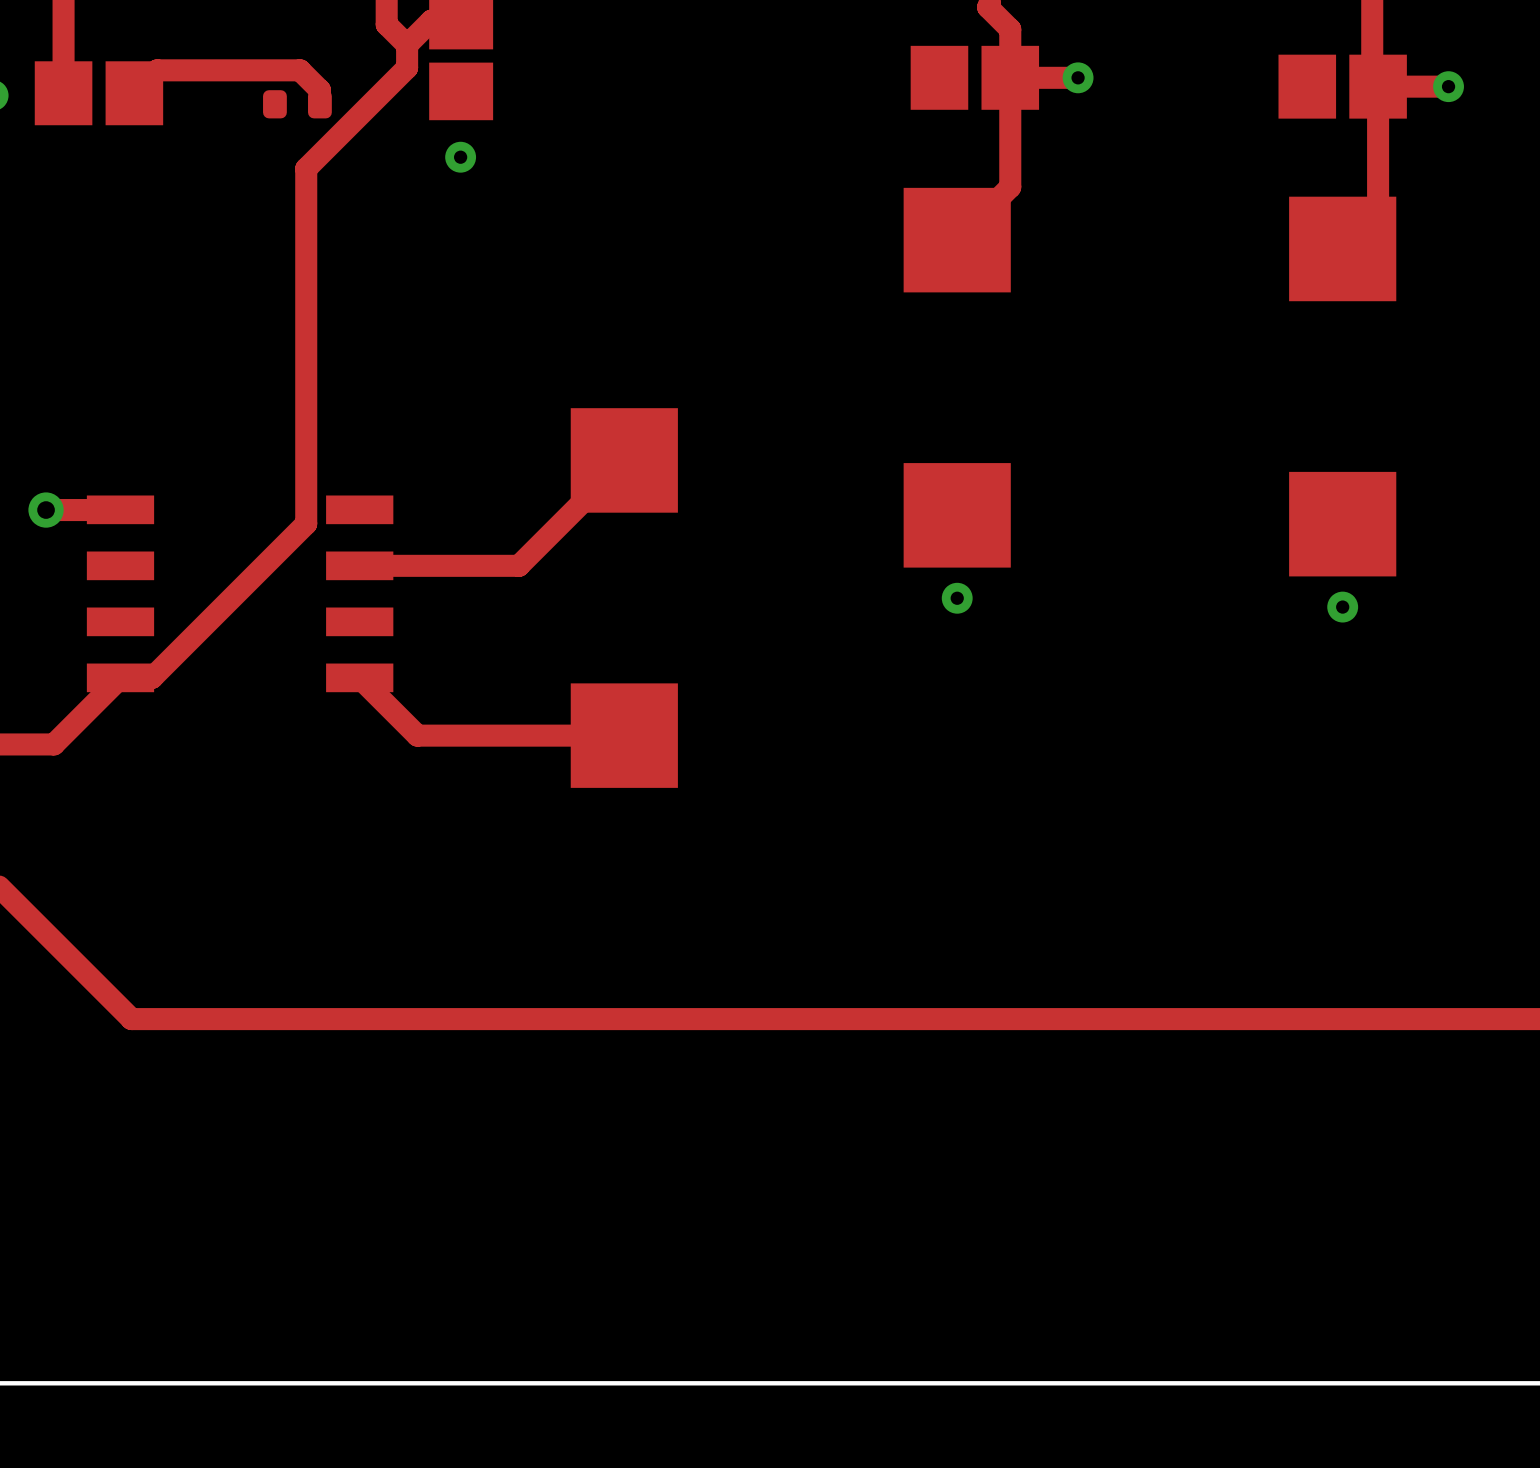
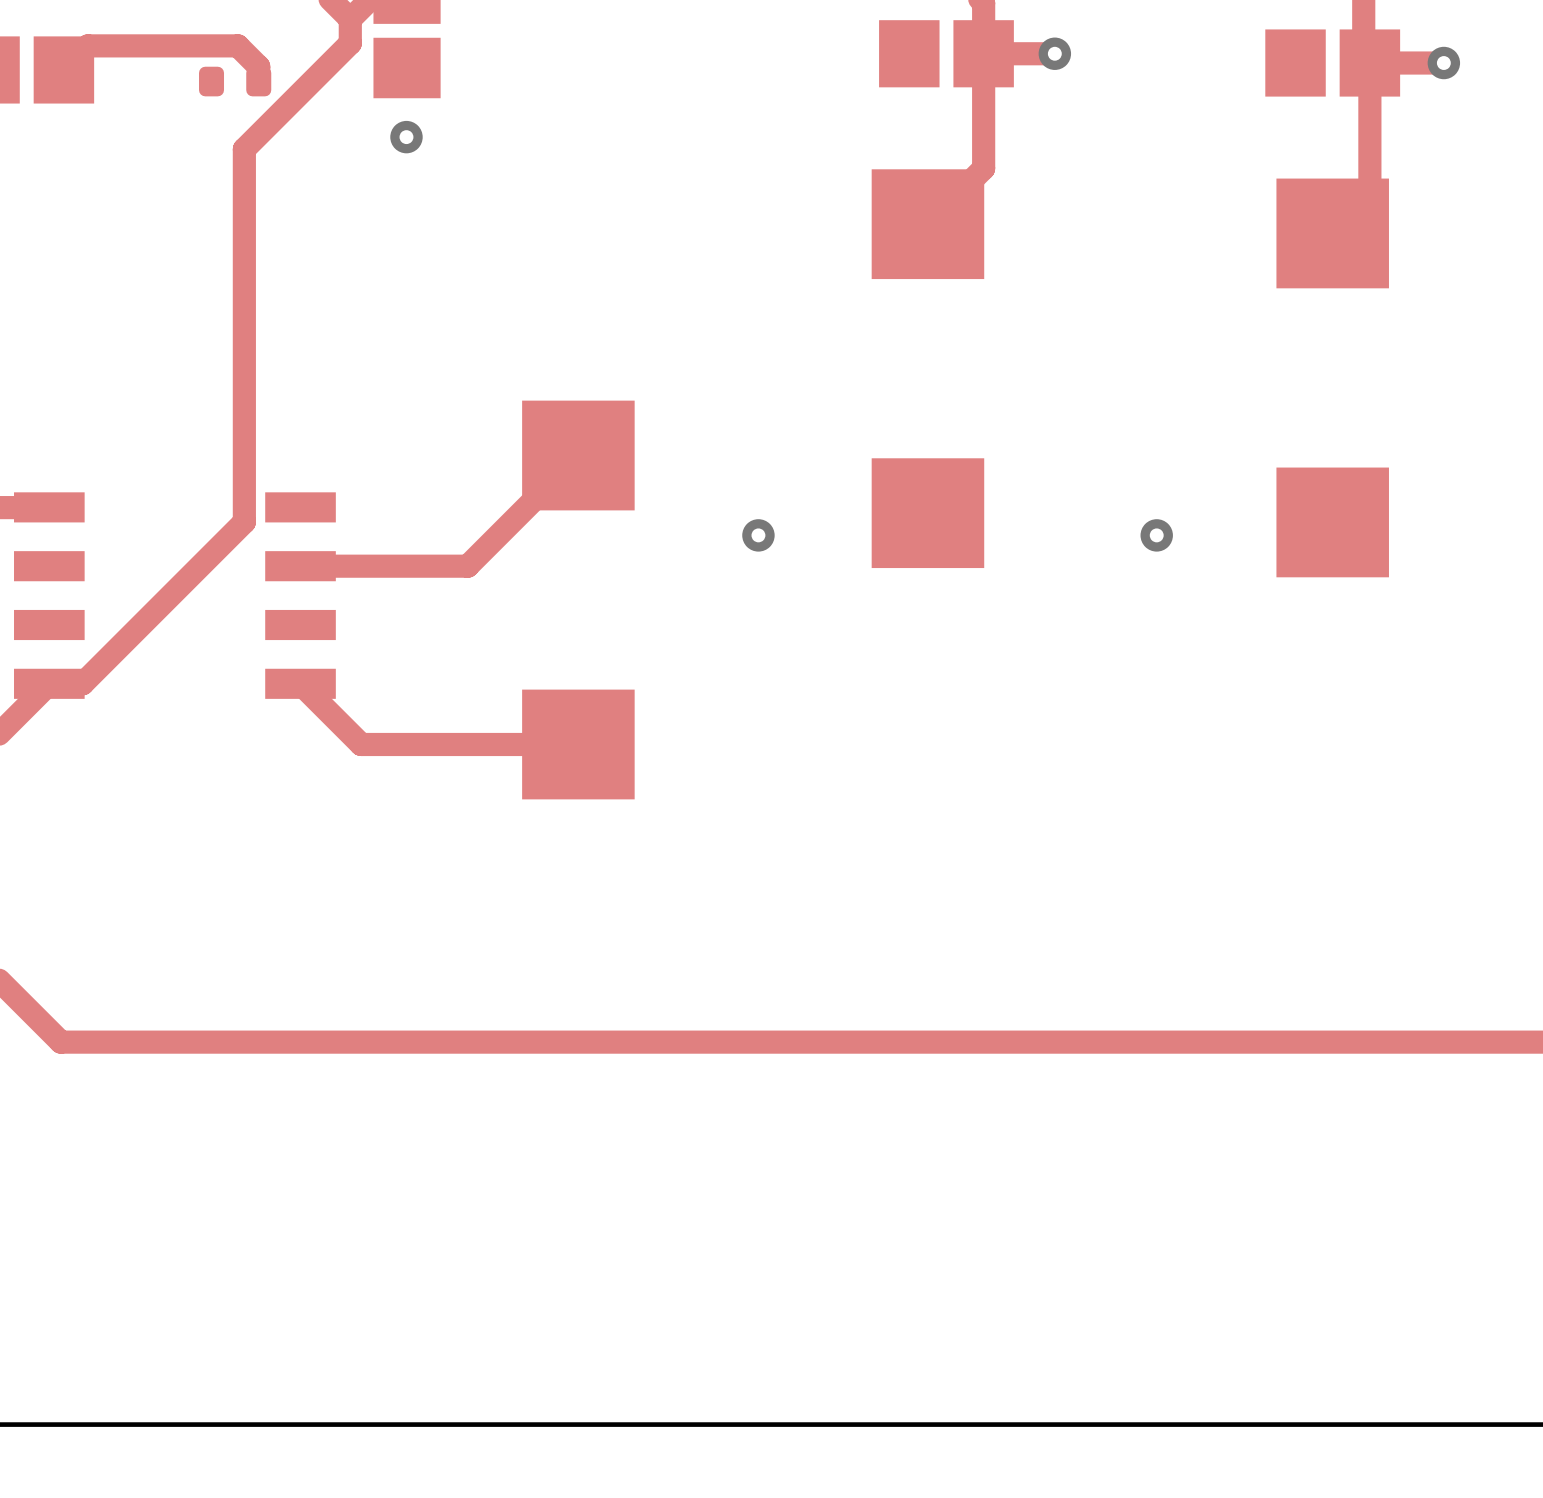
via: none -> (758, 535)
via: none -> (1156, 535)
via: (957, 598) -> none
via: (1342, 607) -> none

